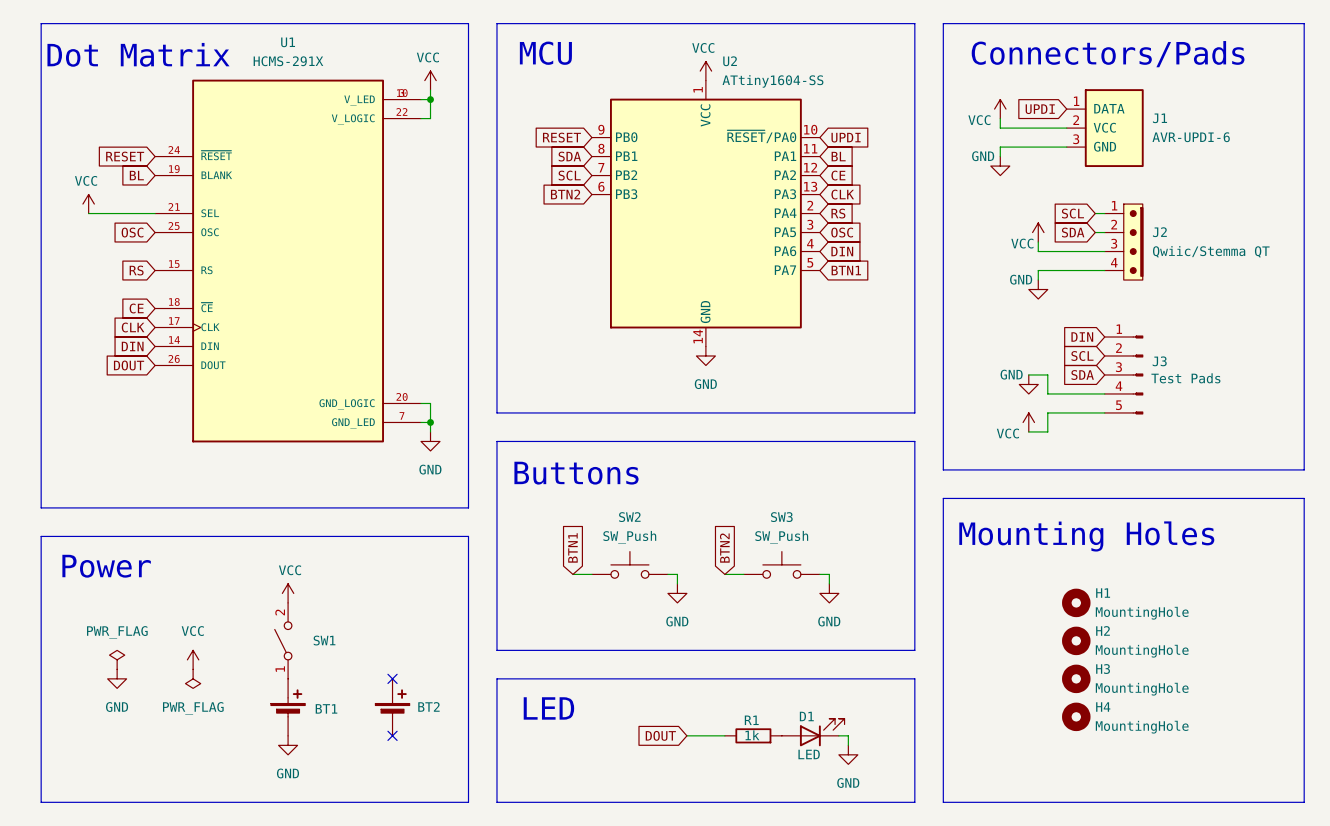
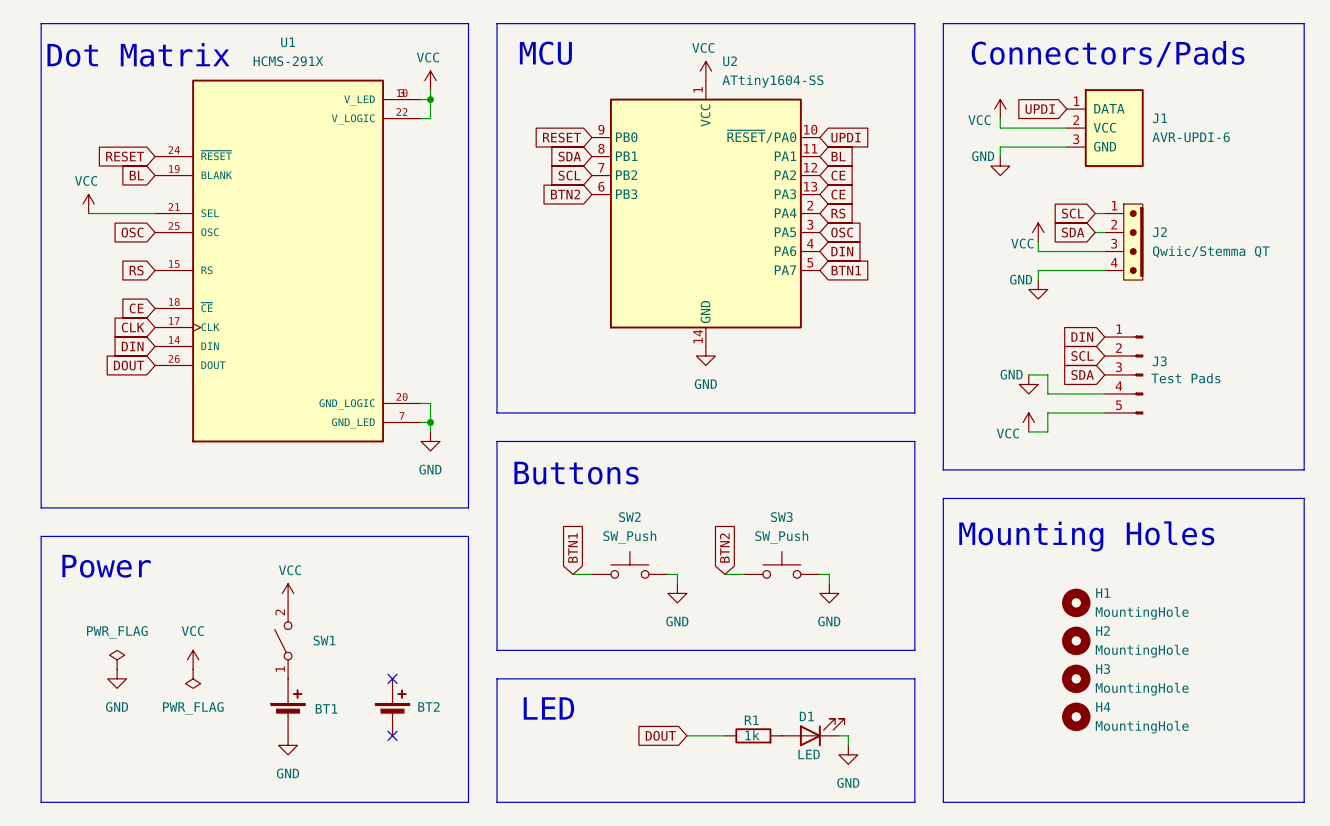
global label: CLK (842, 194) -> CE (838, 194)

